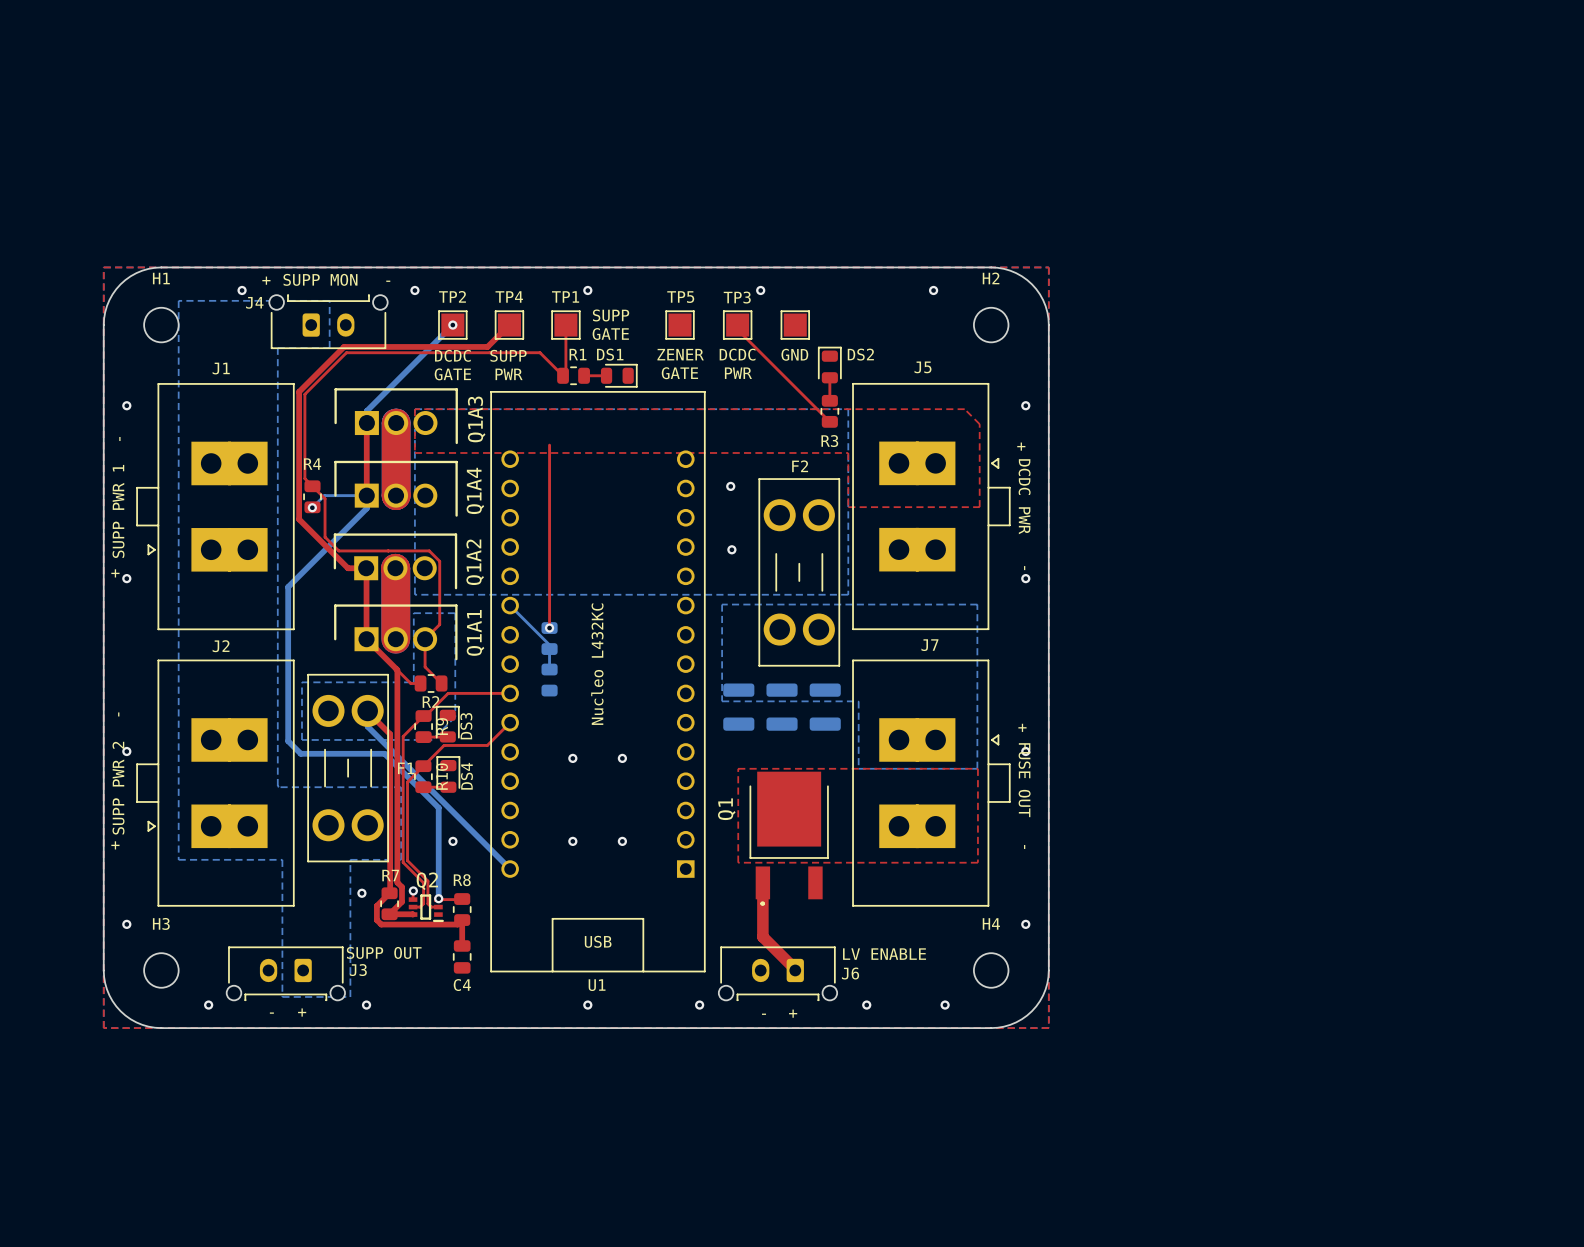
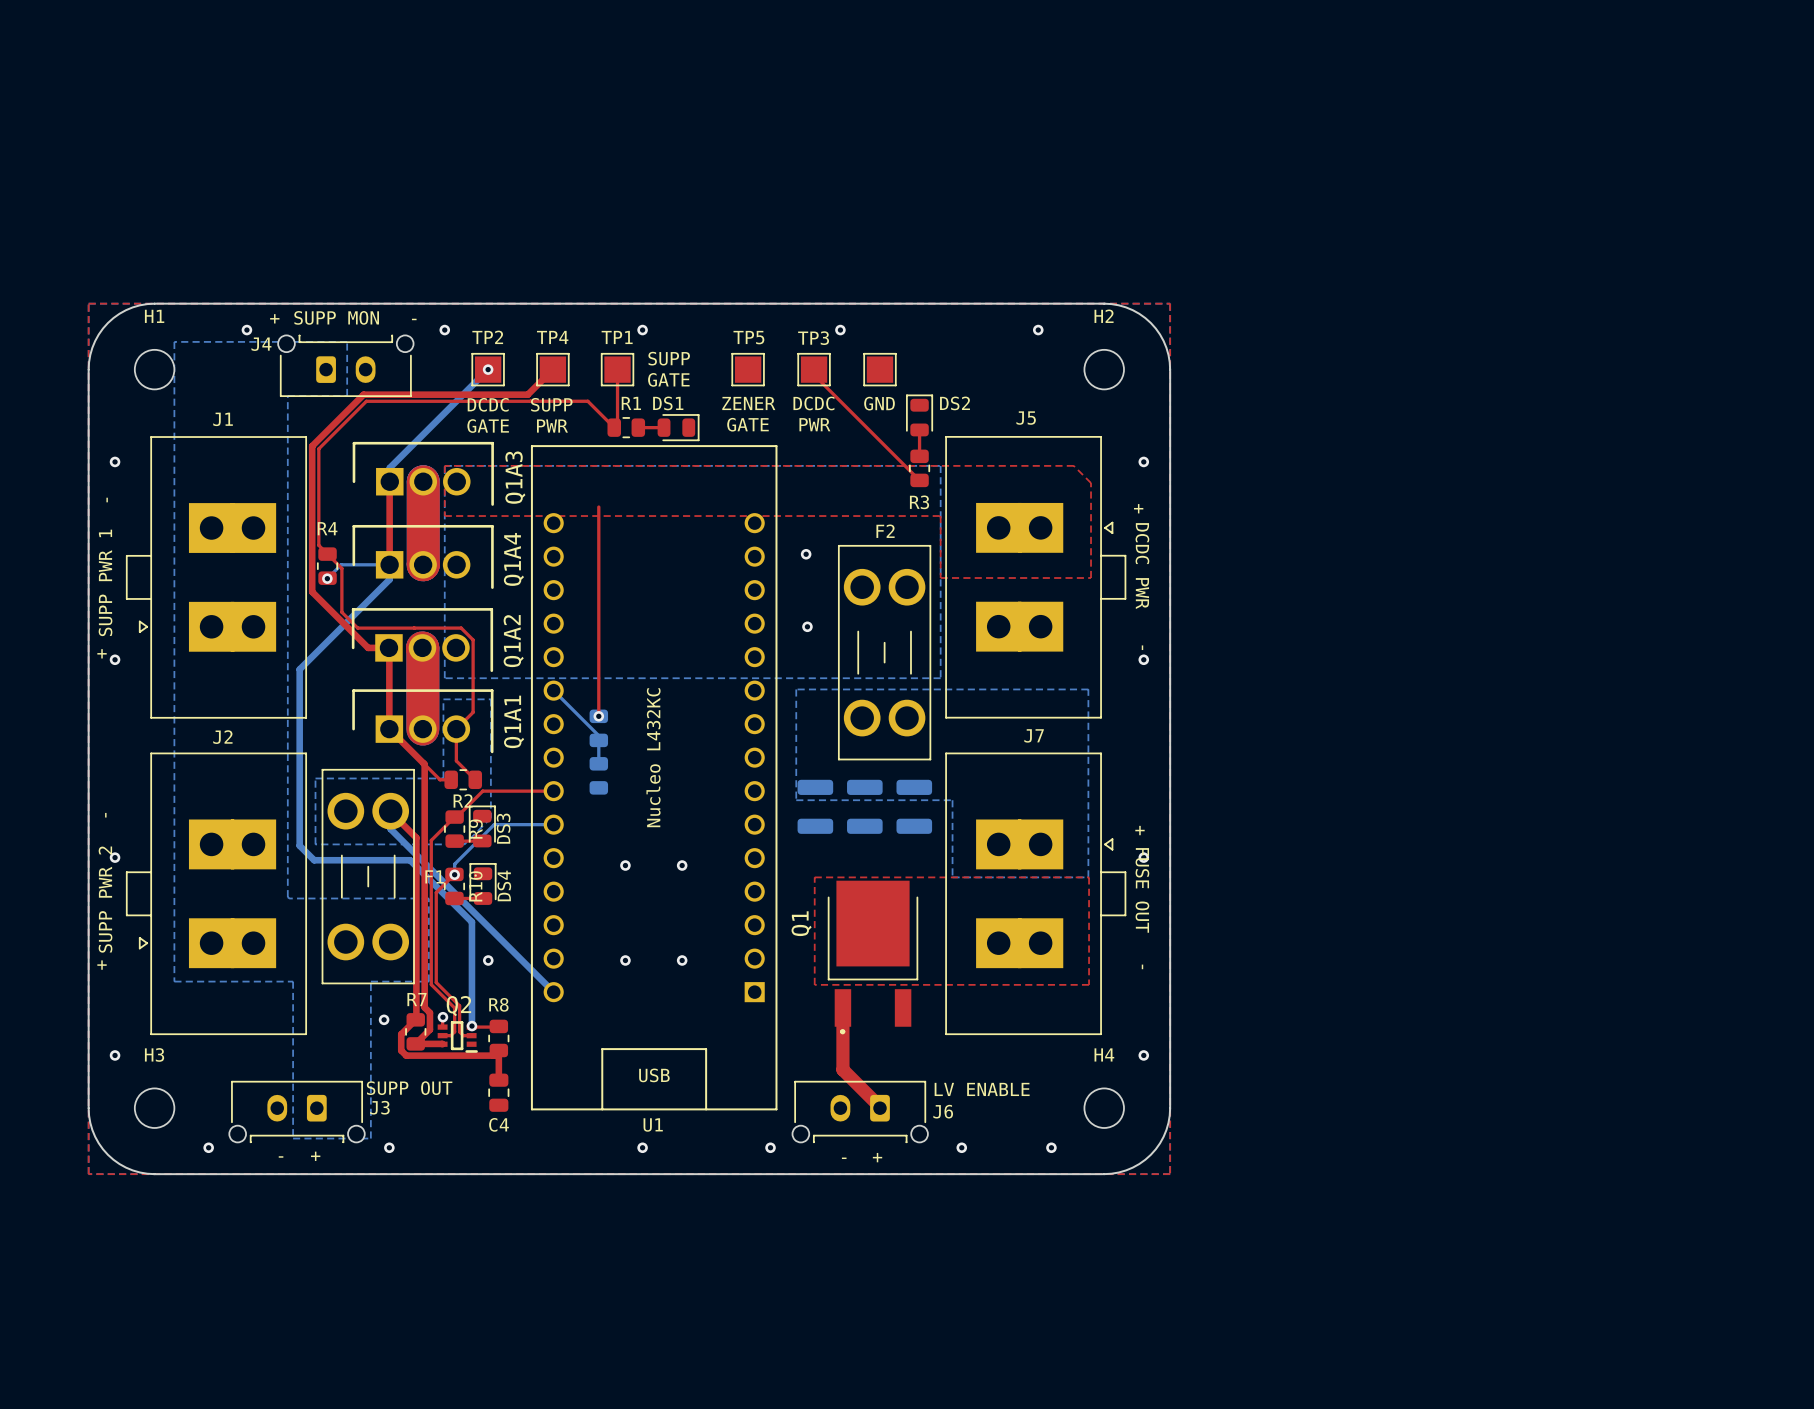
top track: (510, 722) (487, 745) (444, 745) (423, 765) -> none
bottom track: none -> (553, 824) (494, 824) (454, 864) (454, 874)
via: none -> (454, 874)

